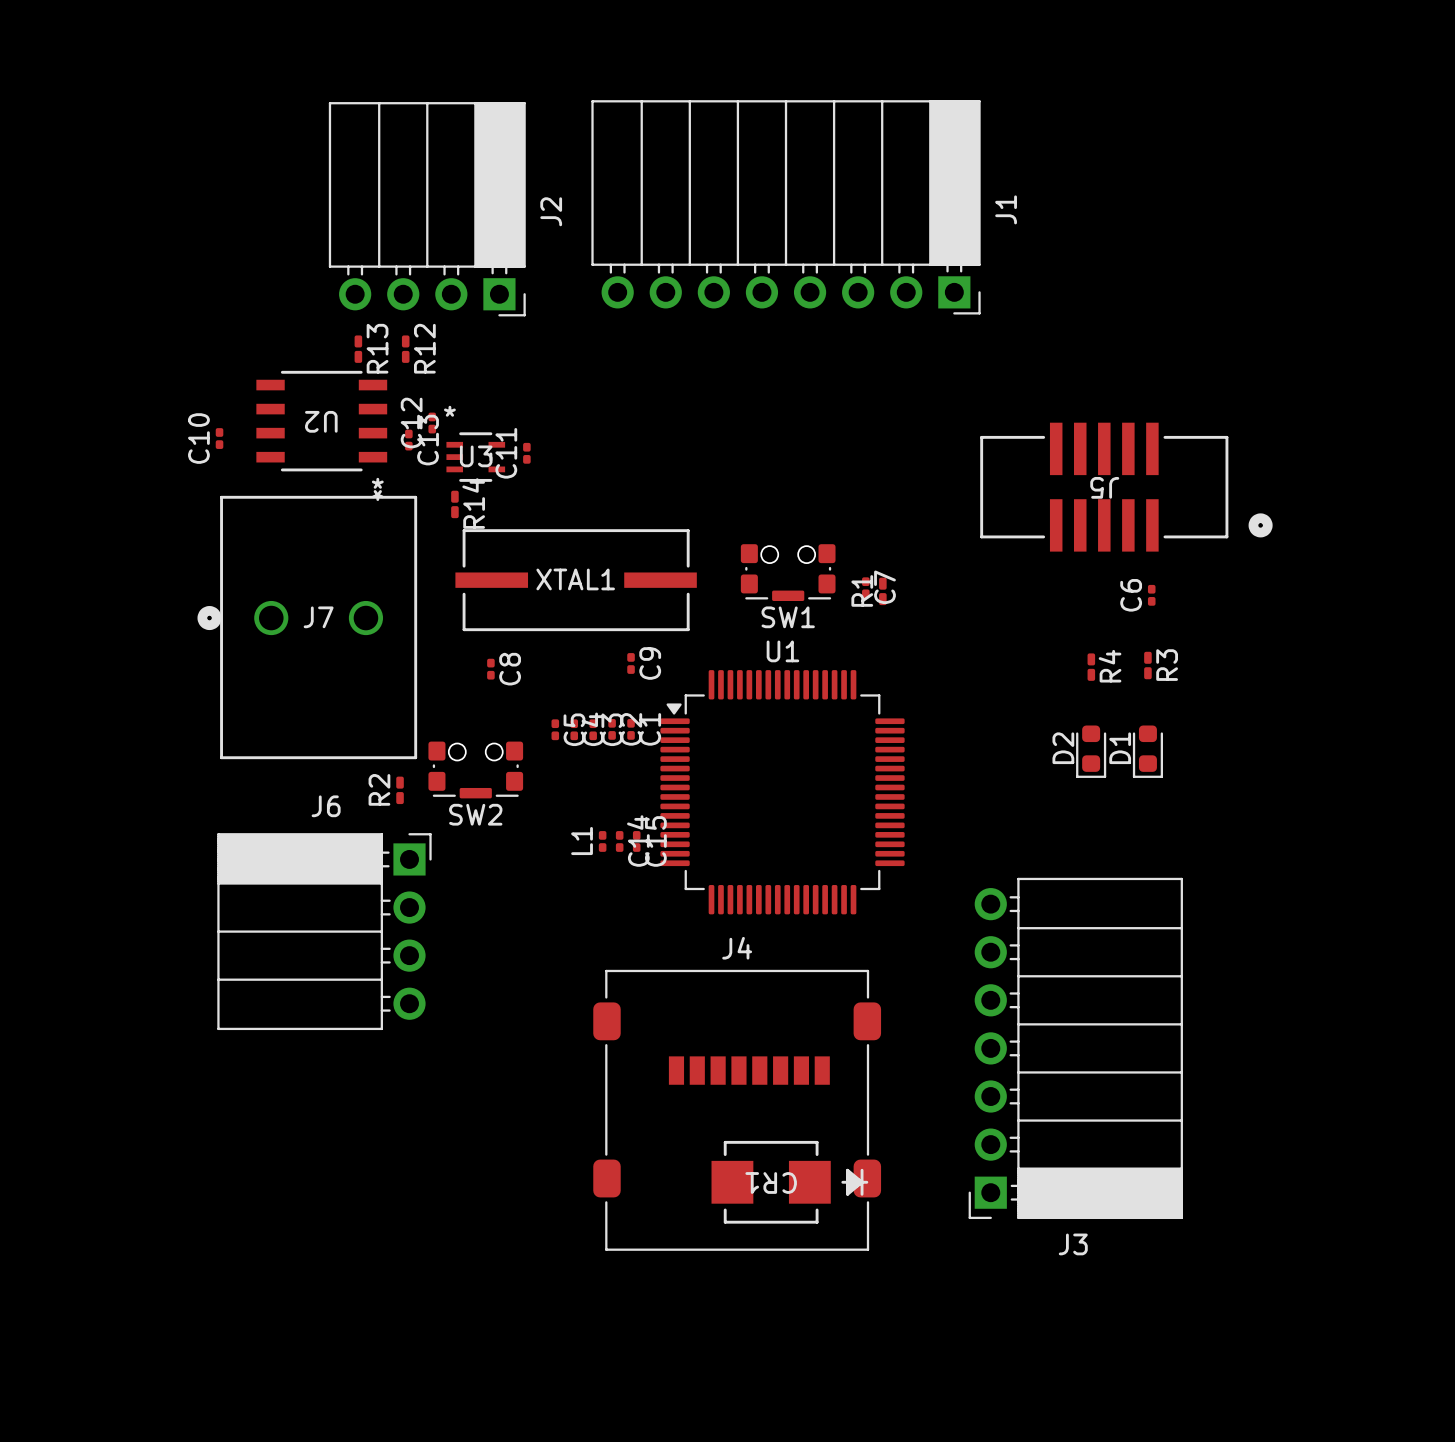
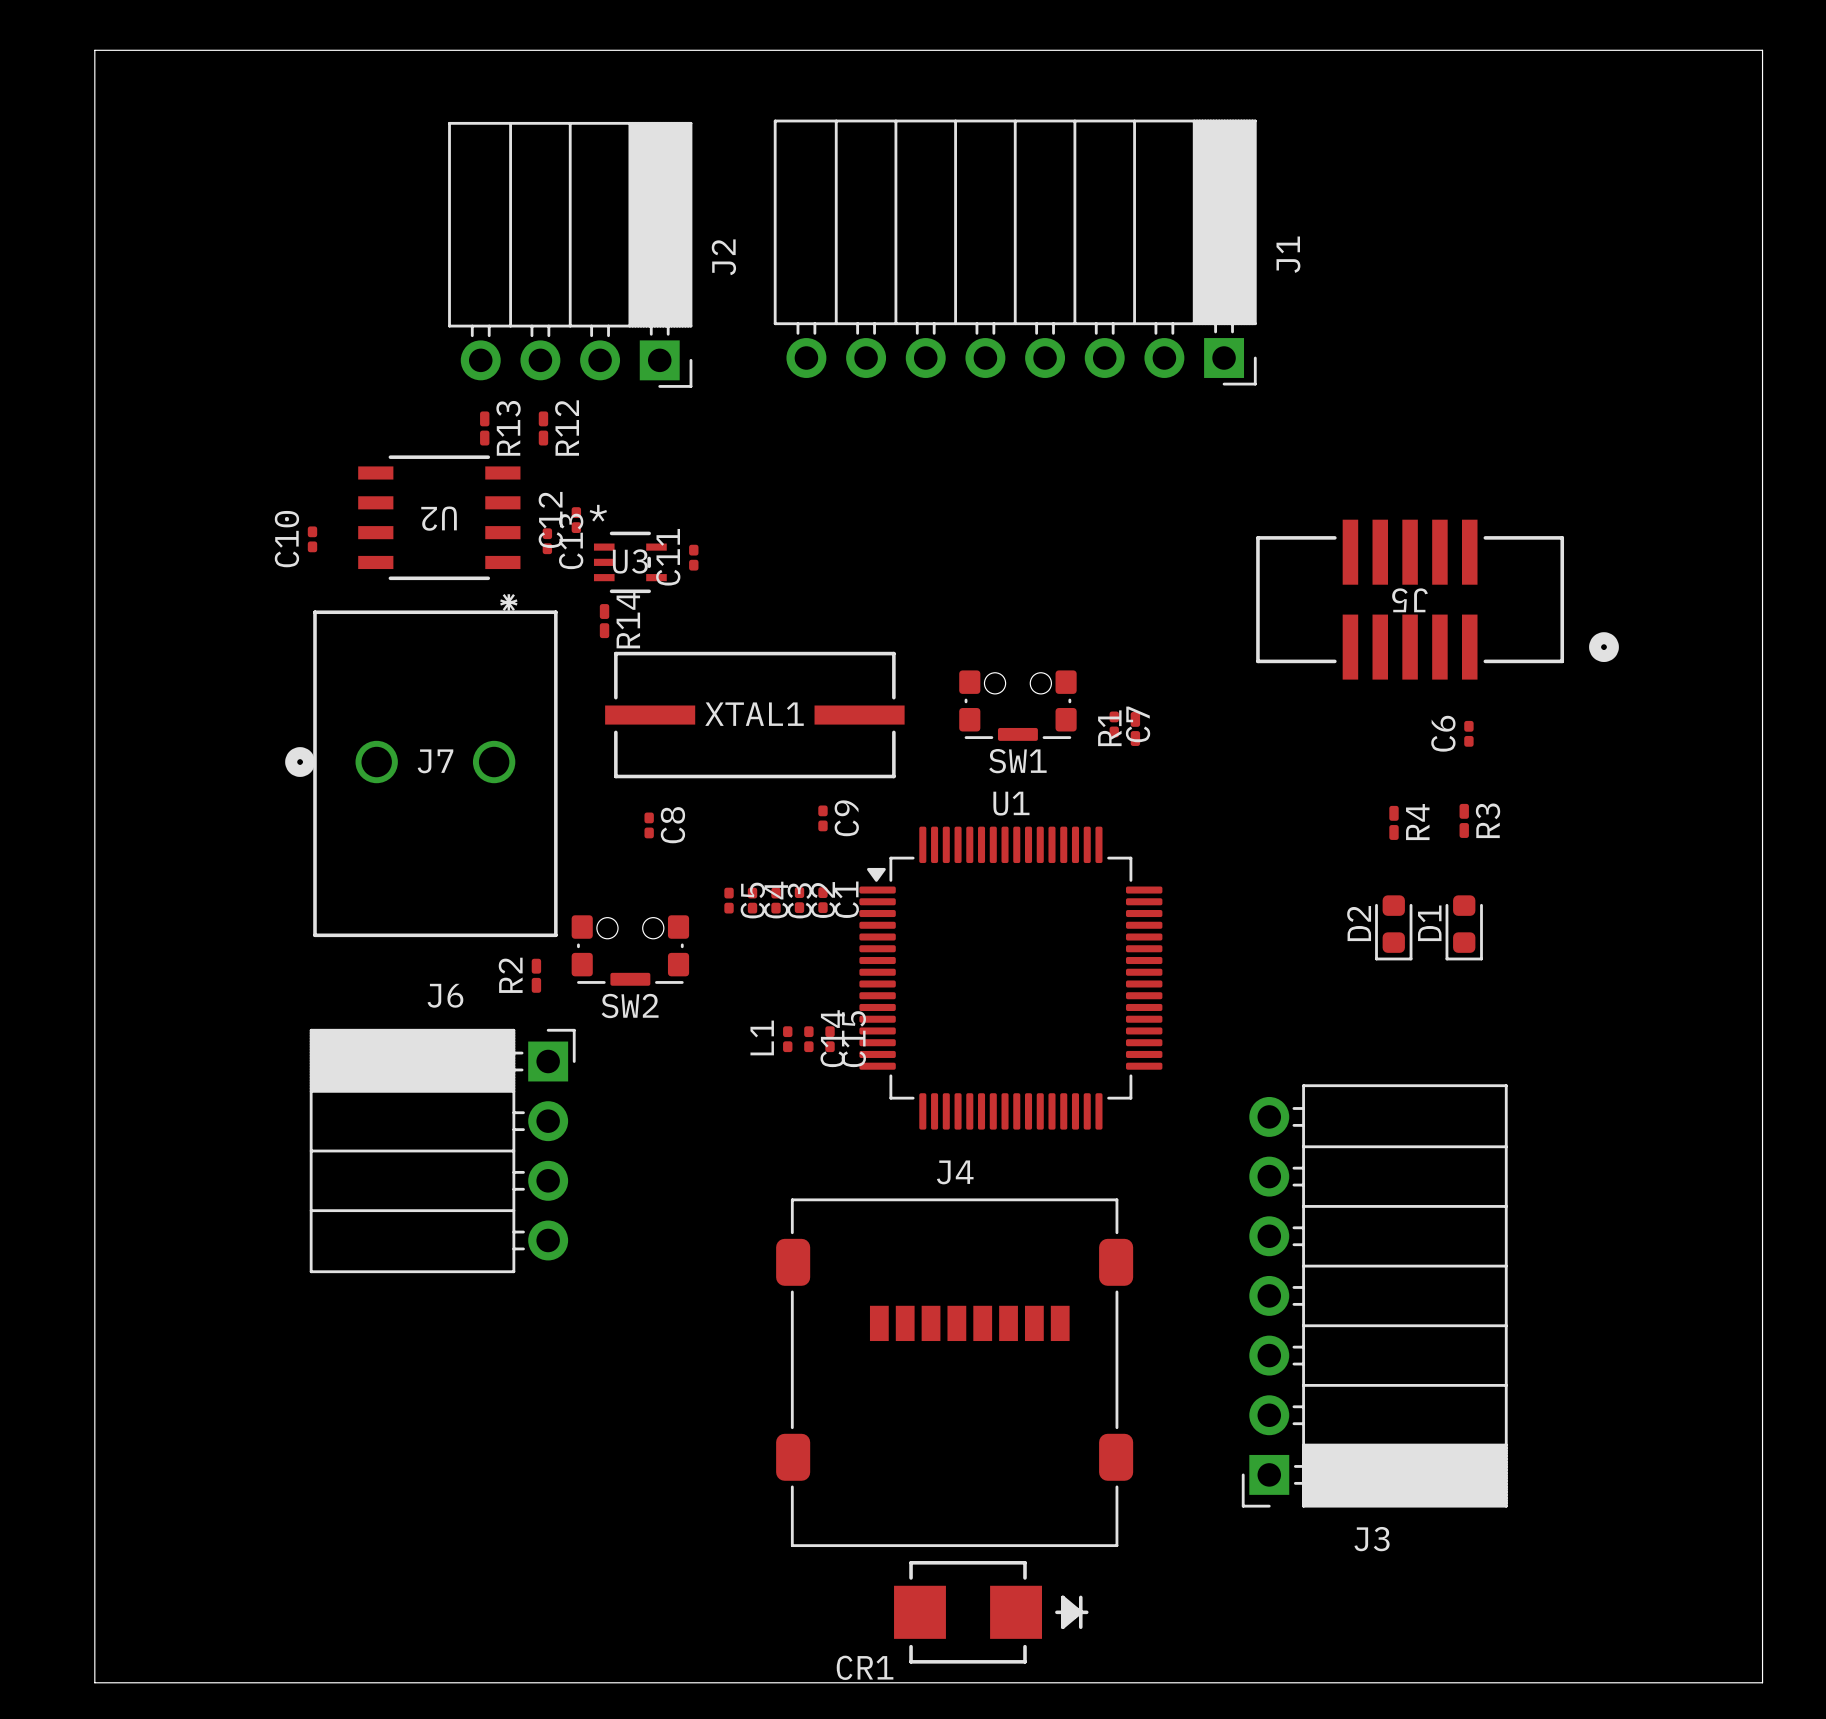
board edge: none -> (94, 50) (1762, 50) (1762, 1682) (94, 1682) (94, 50)
CR1 name rotation: 0° (771, 1182) -> 180° (865, 1667)
CR1 name position: CR1 (771, 1182) -> CR1 (865, 1667)
CR1 position: (789, 1182) -> (991, 1612)

